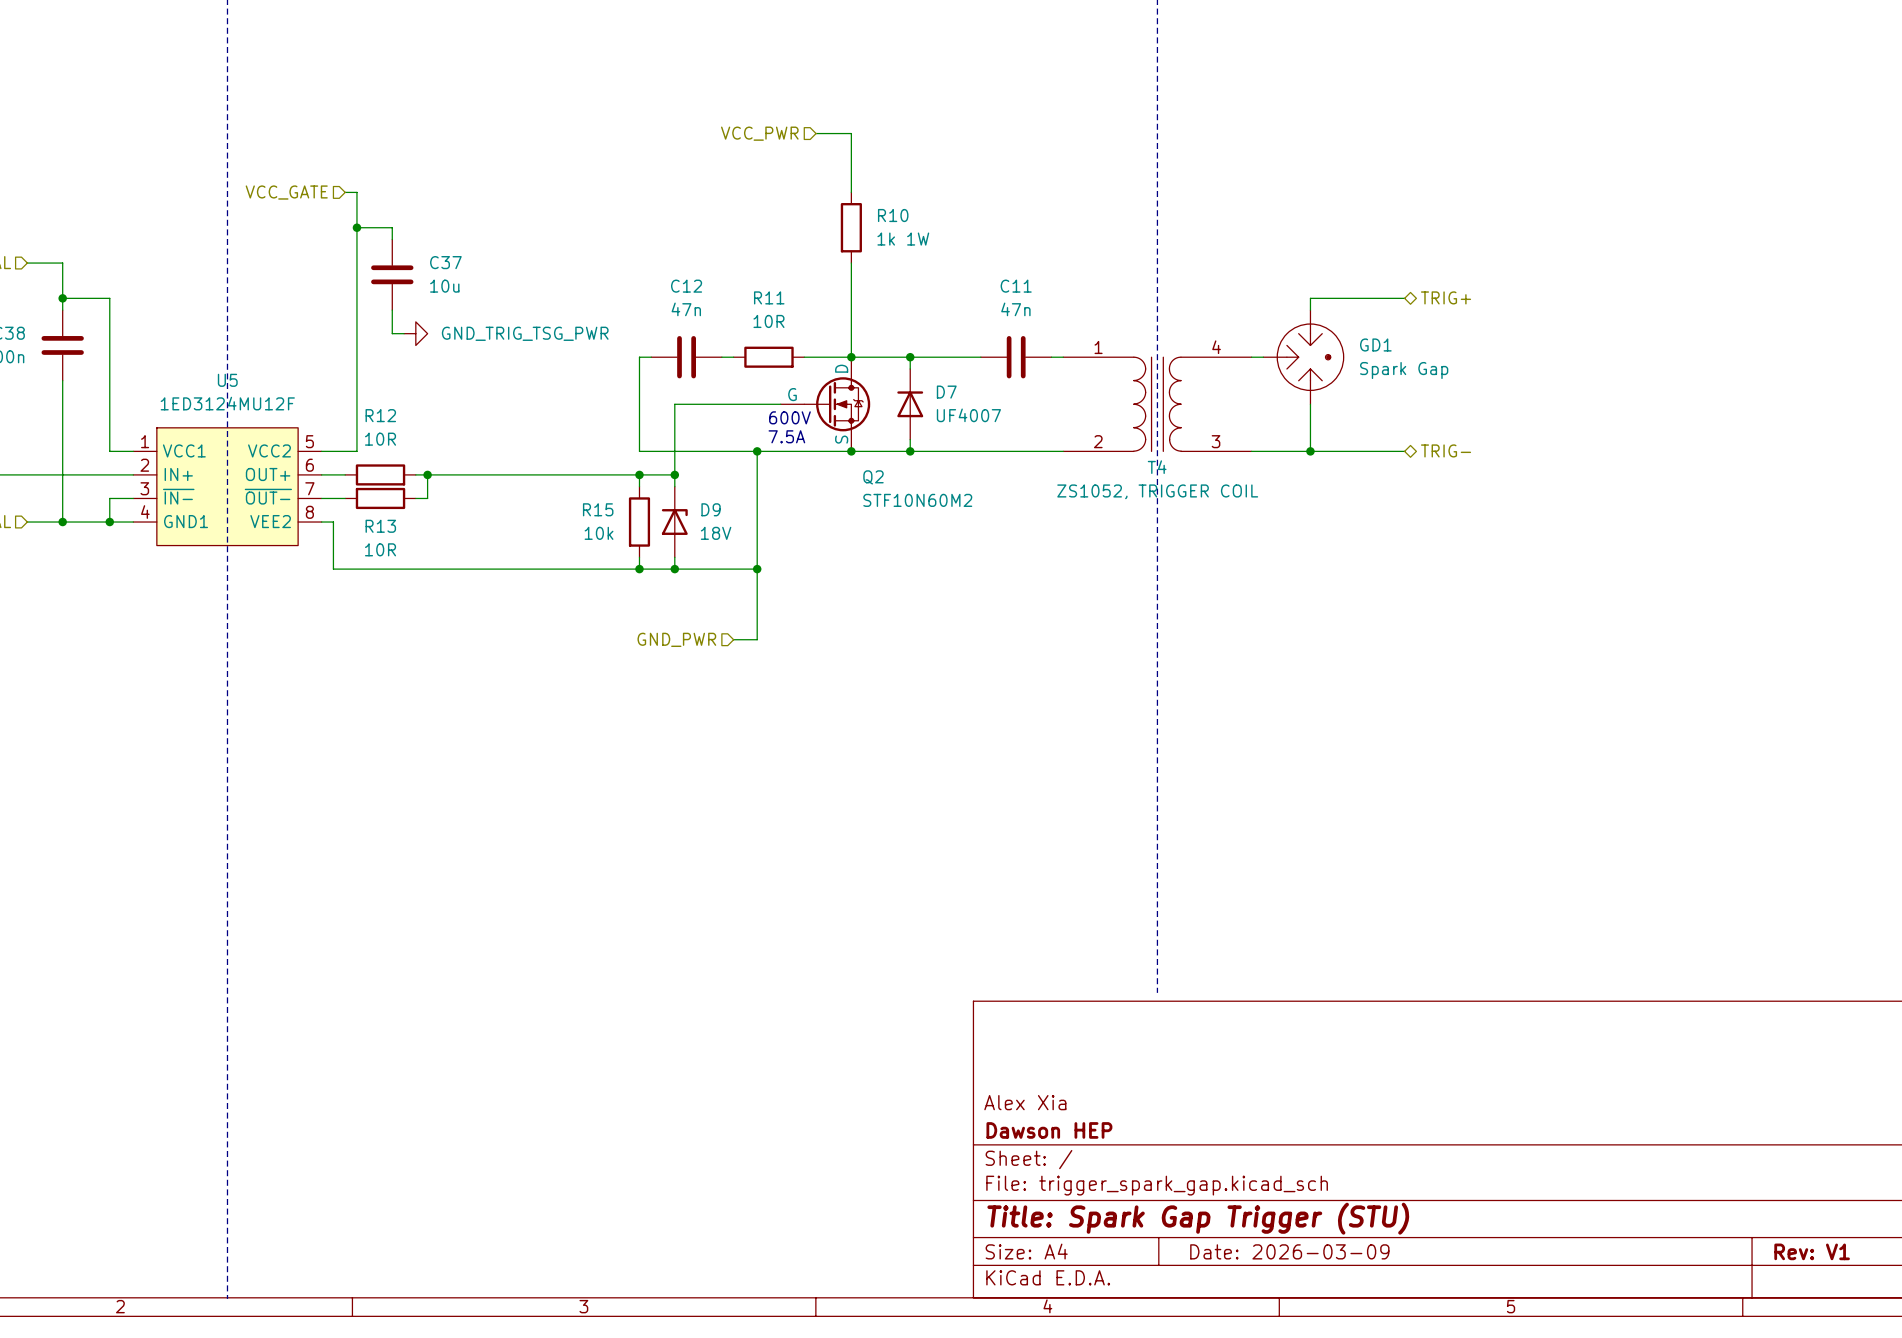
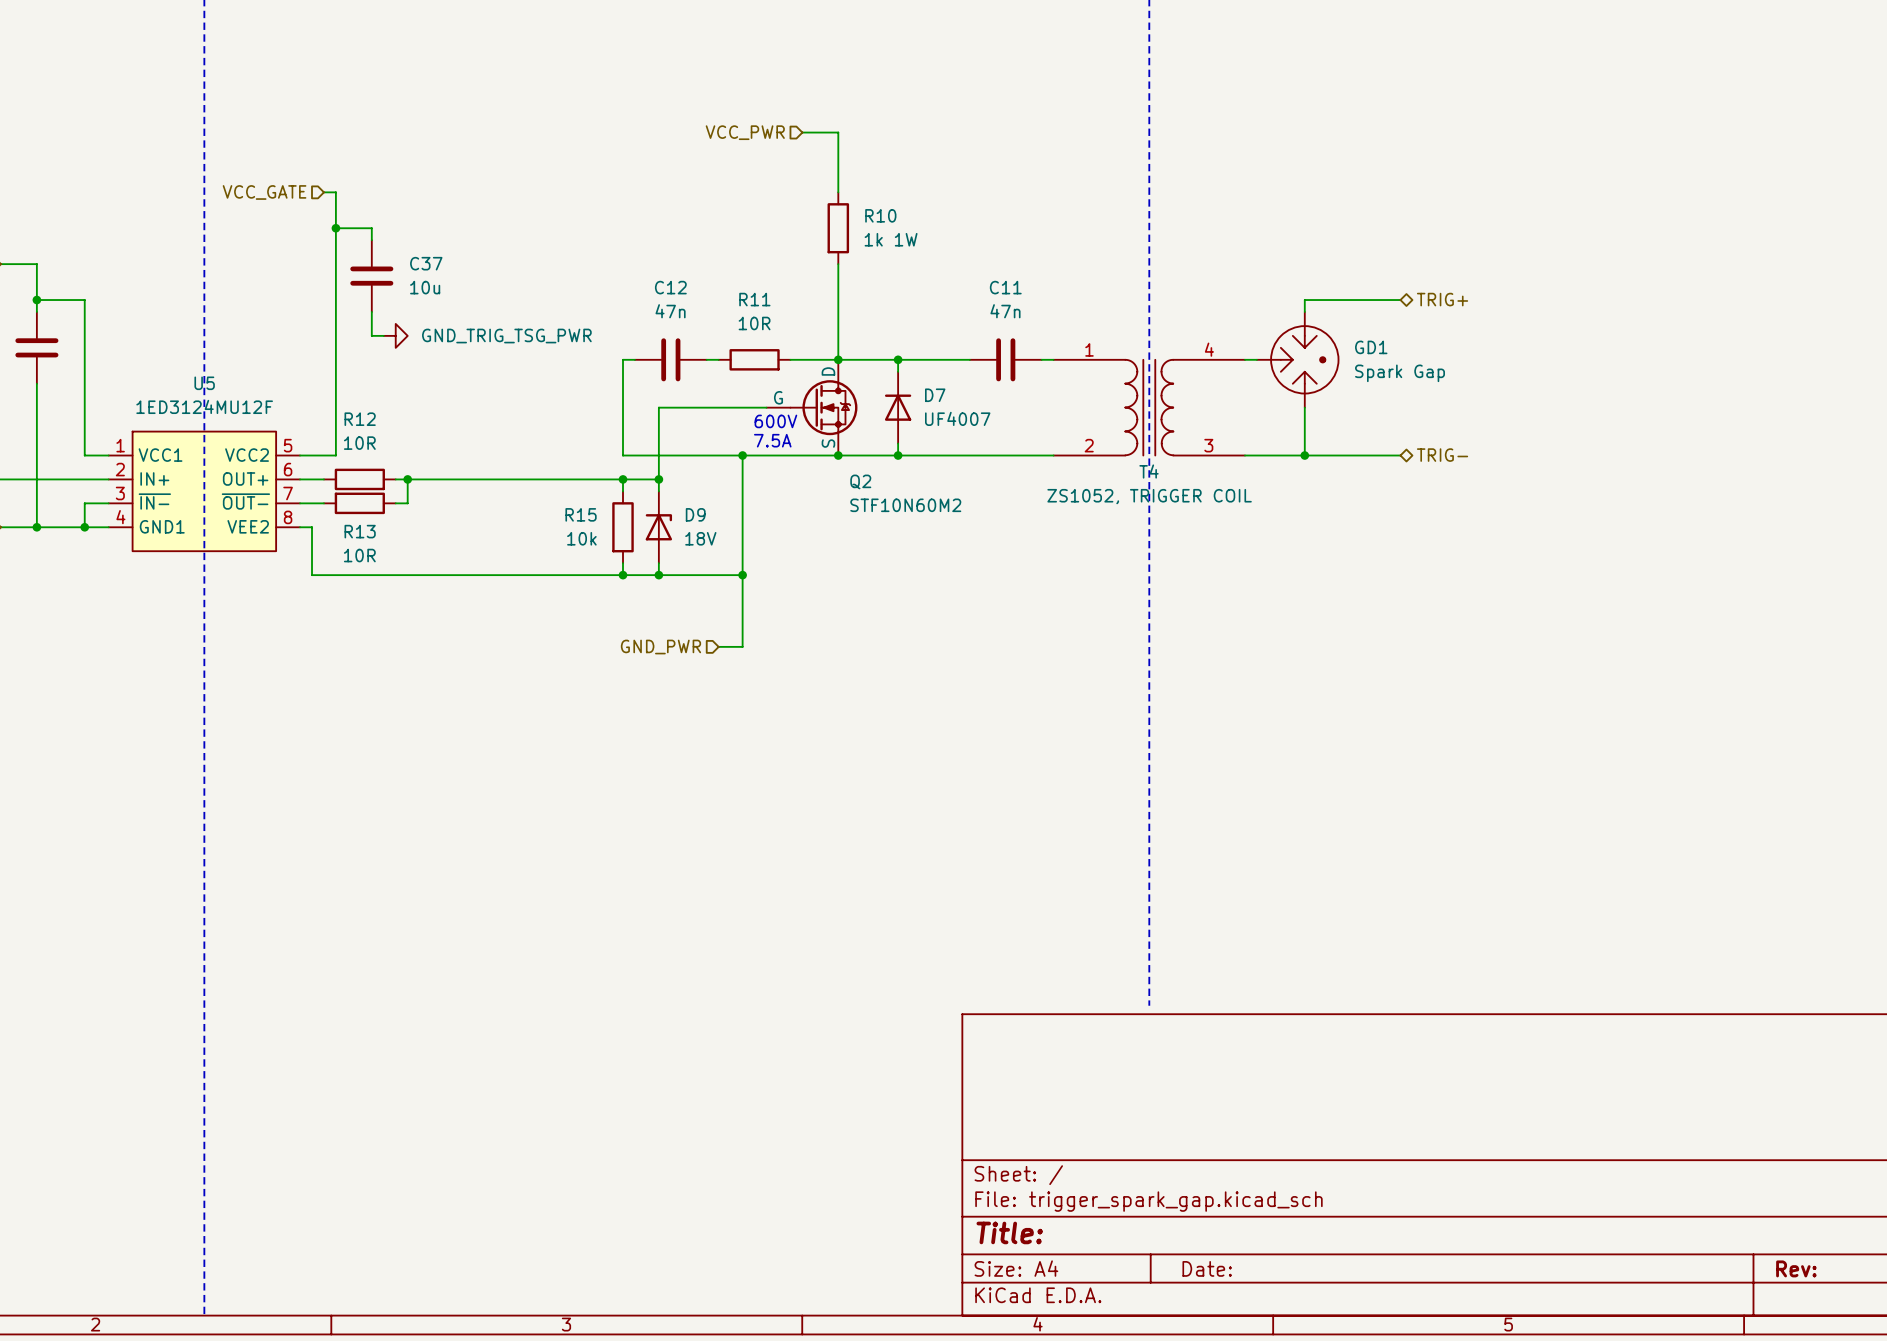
title block: Alex Xia (1025, 1102) -> none
title block: Dawson HEP (1049, 1130) -> none
title block: Title: Spark Gap Trigger (STU) (1198, 1218) -> Title: (1009, 1232)
title block: Date: 2026-03-09 (1289, 1251) -> Date: (1207, 1268)
title block: Rev: V1 (1812, 1251) -> Rev: (1796, 1268)

